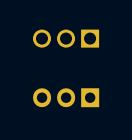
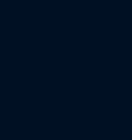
part: (66, 38) -> none
part: (66, 97) -> none

